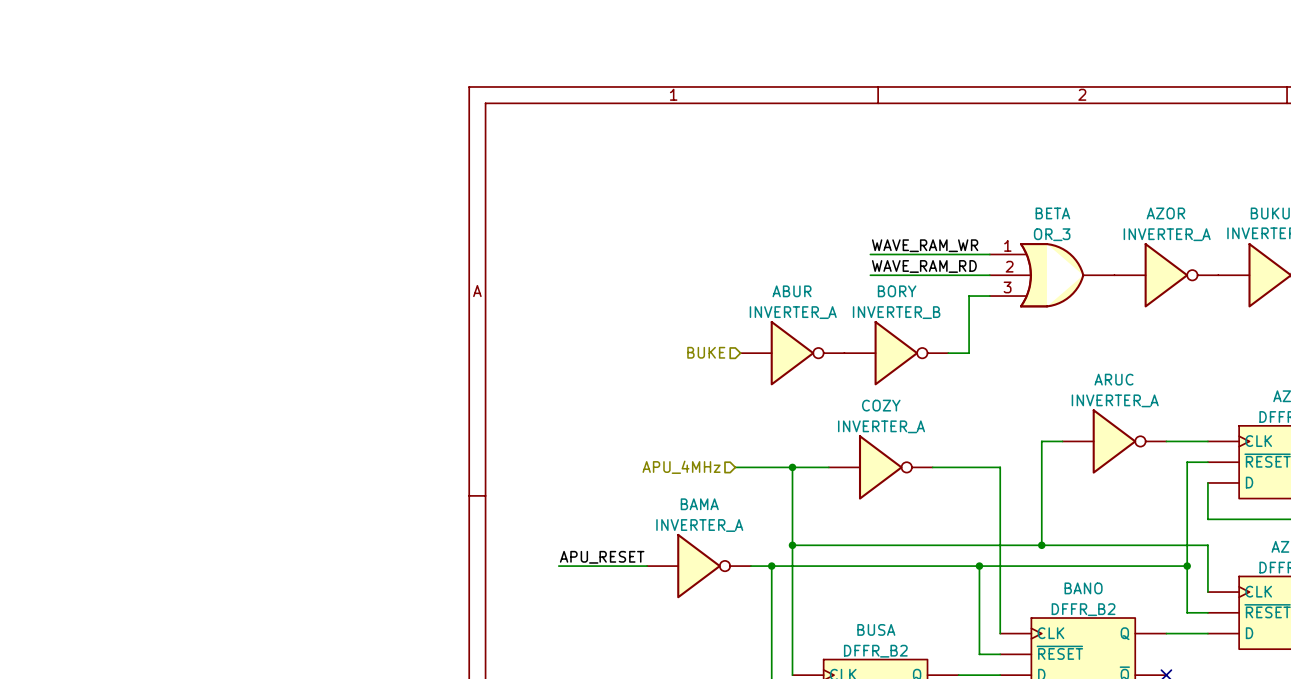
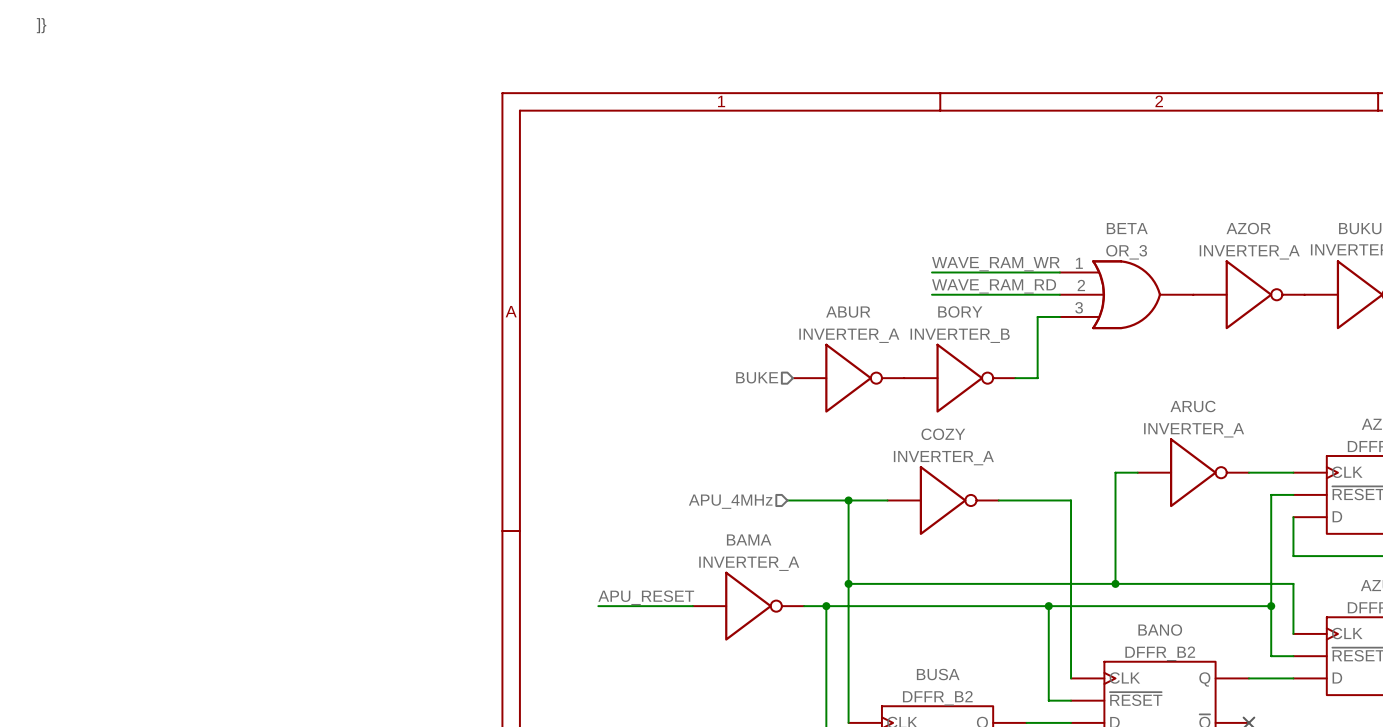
text: none -> ]} (41, 25)

